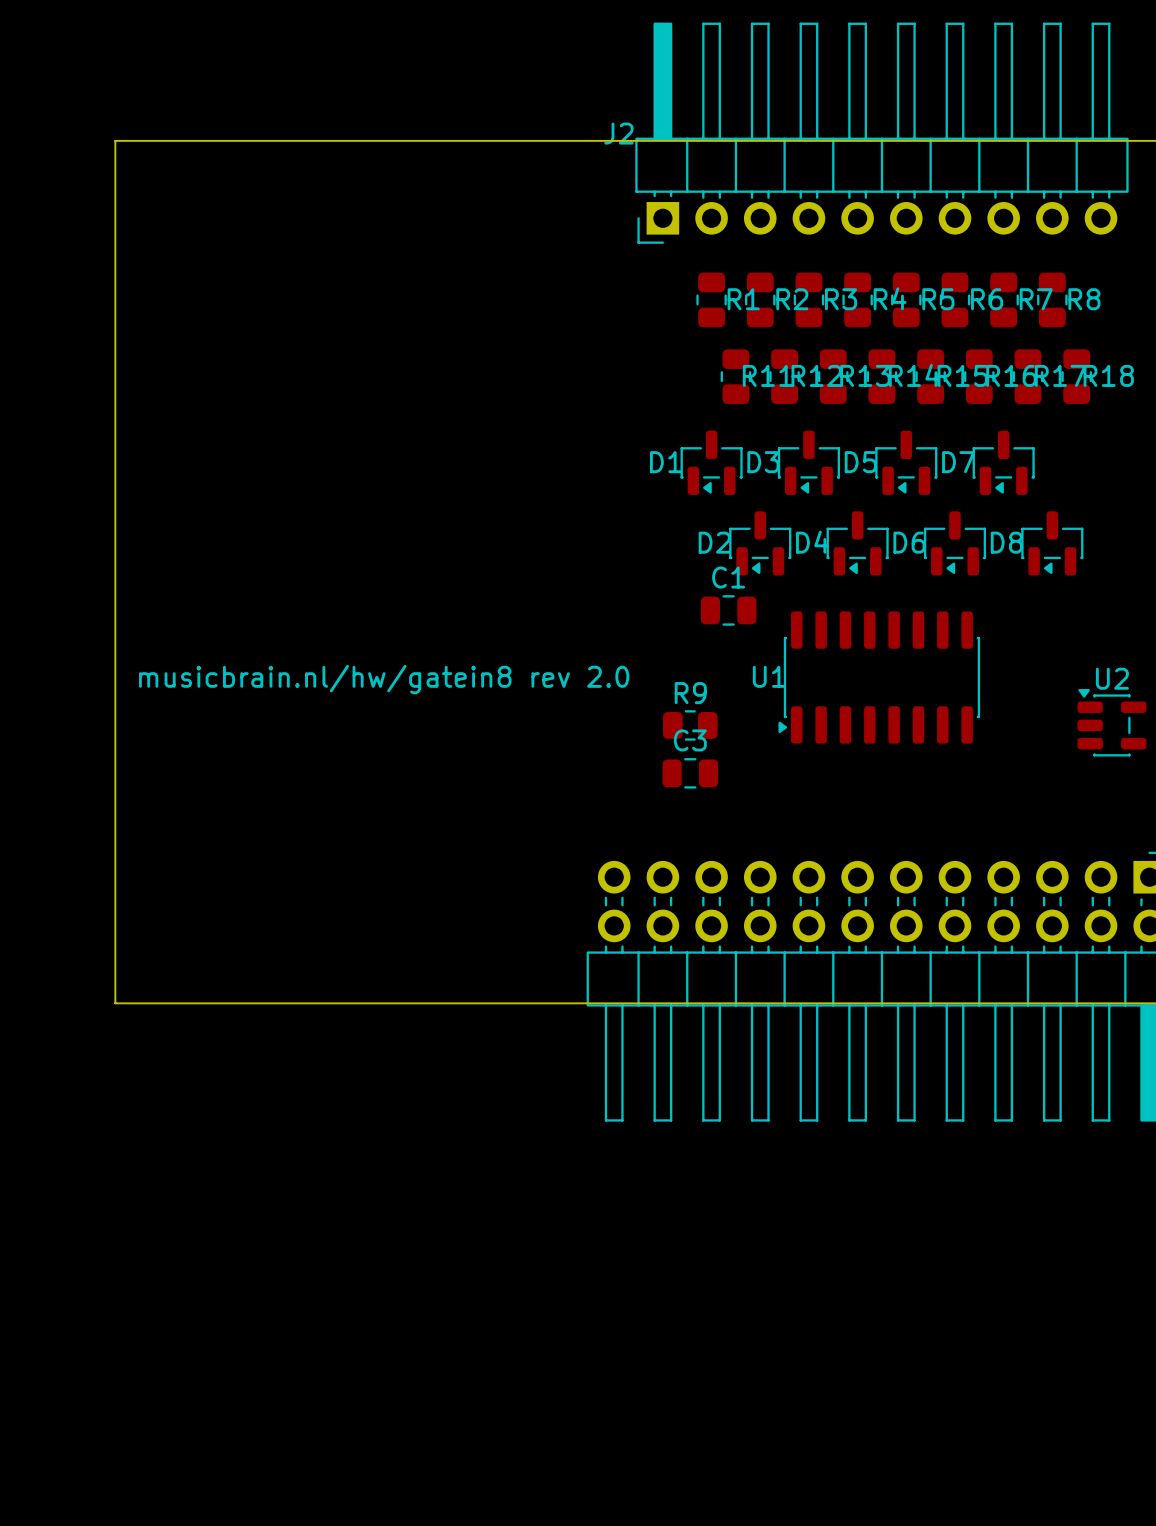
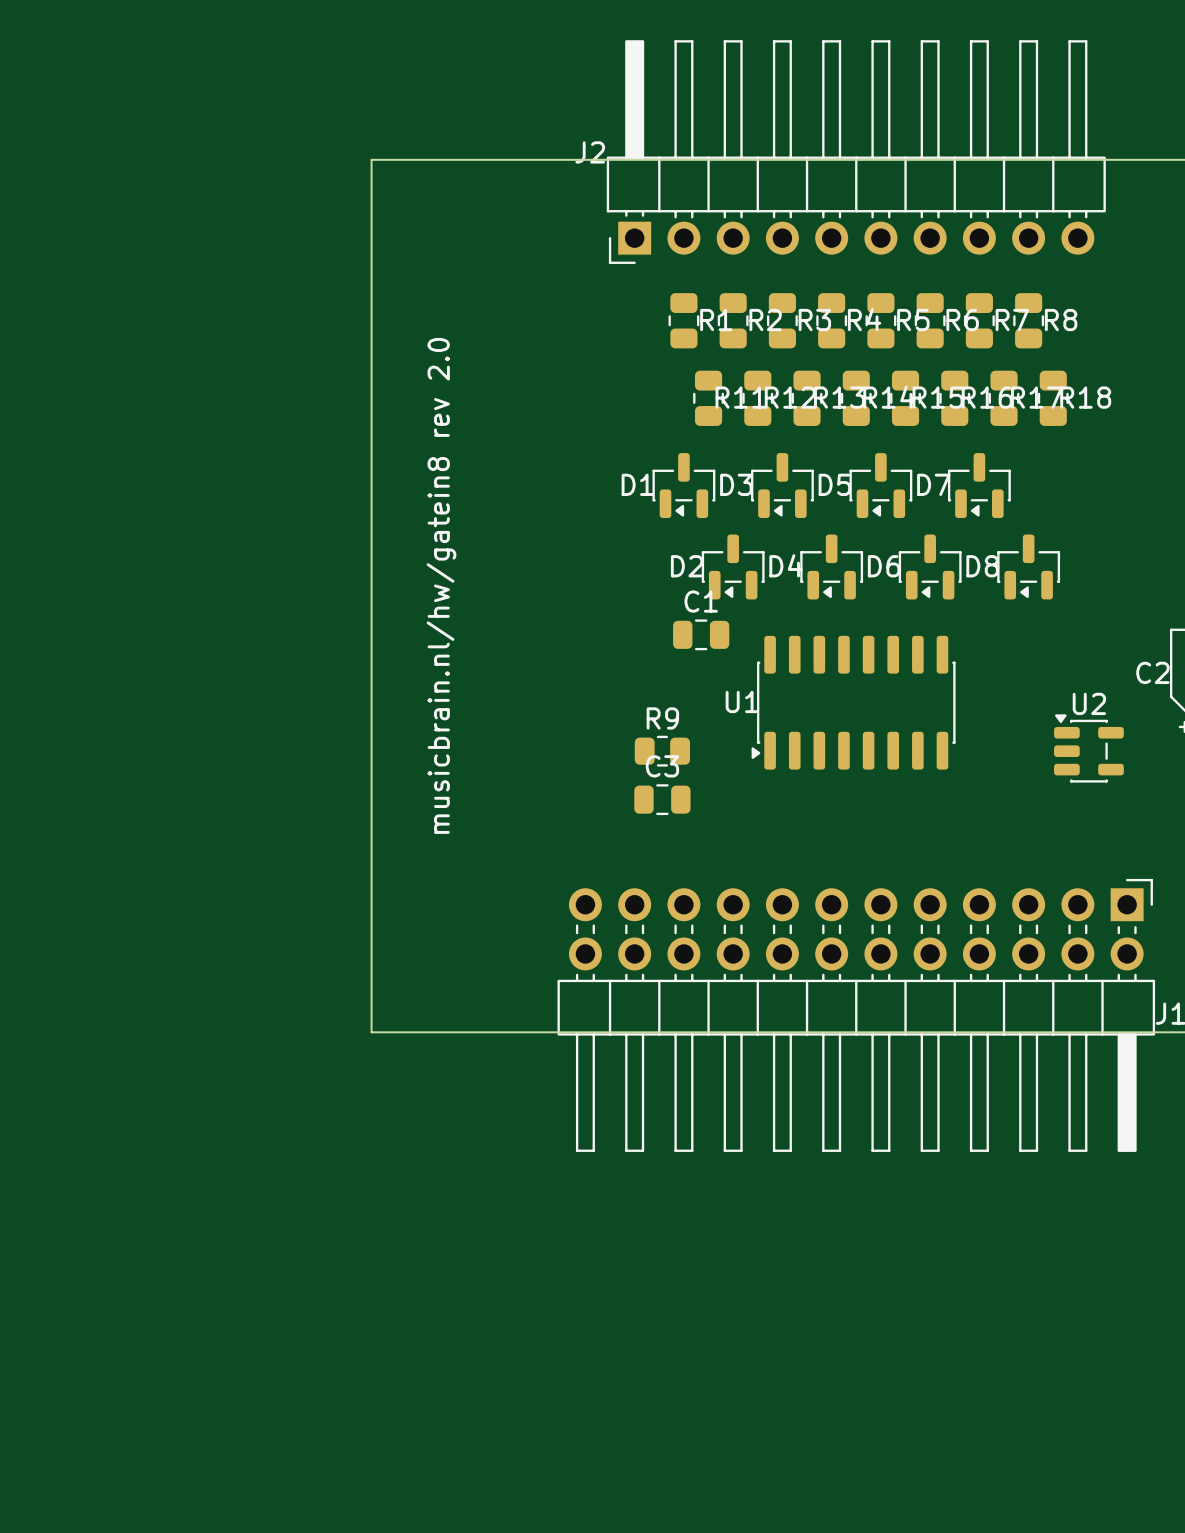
board edge: (402, 140) (115, 140) (115, 1003) (402, 1003) -> (371, 159) (371, 1032)
text rotation: 0° (384, 679) -> 90° counterclockwise (441, 585)

